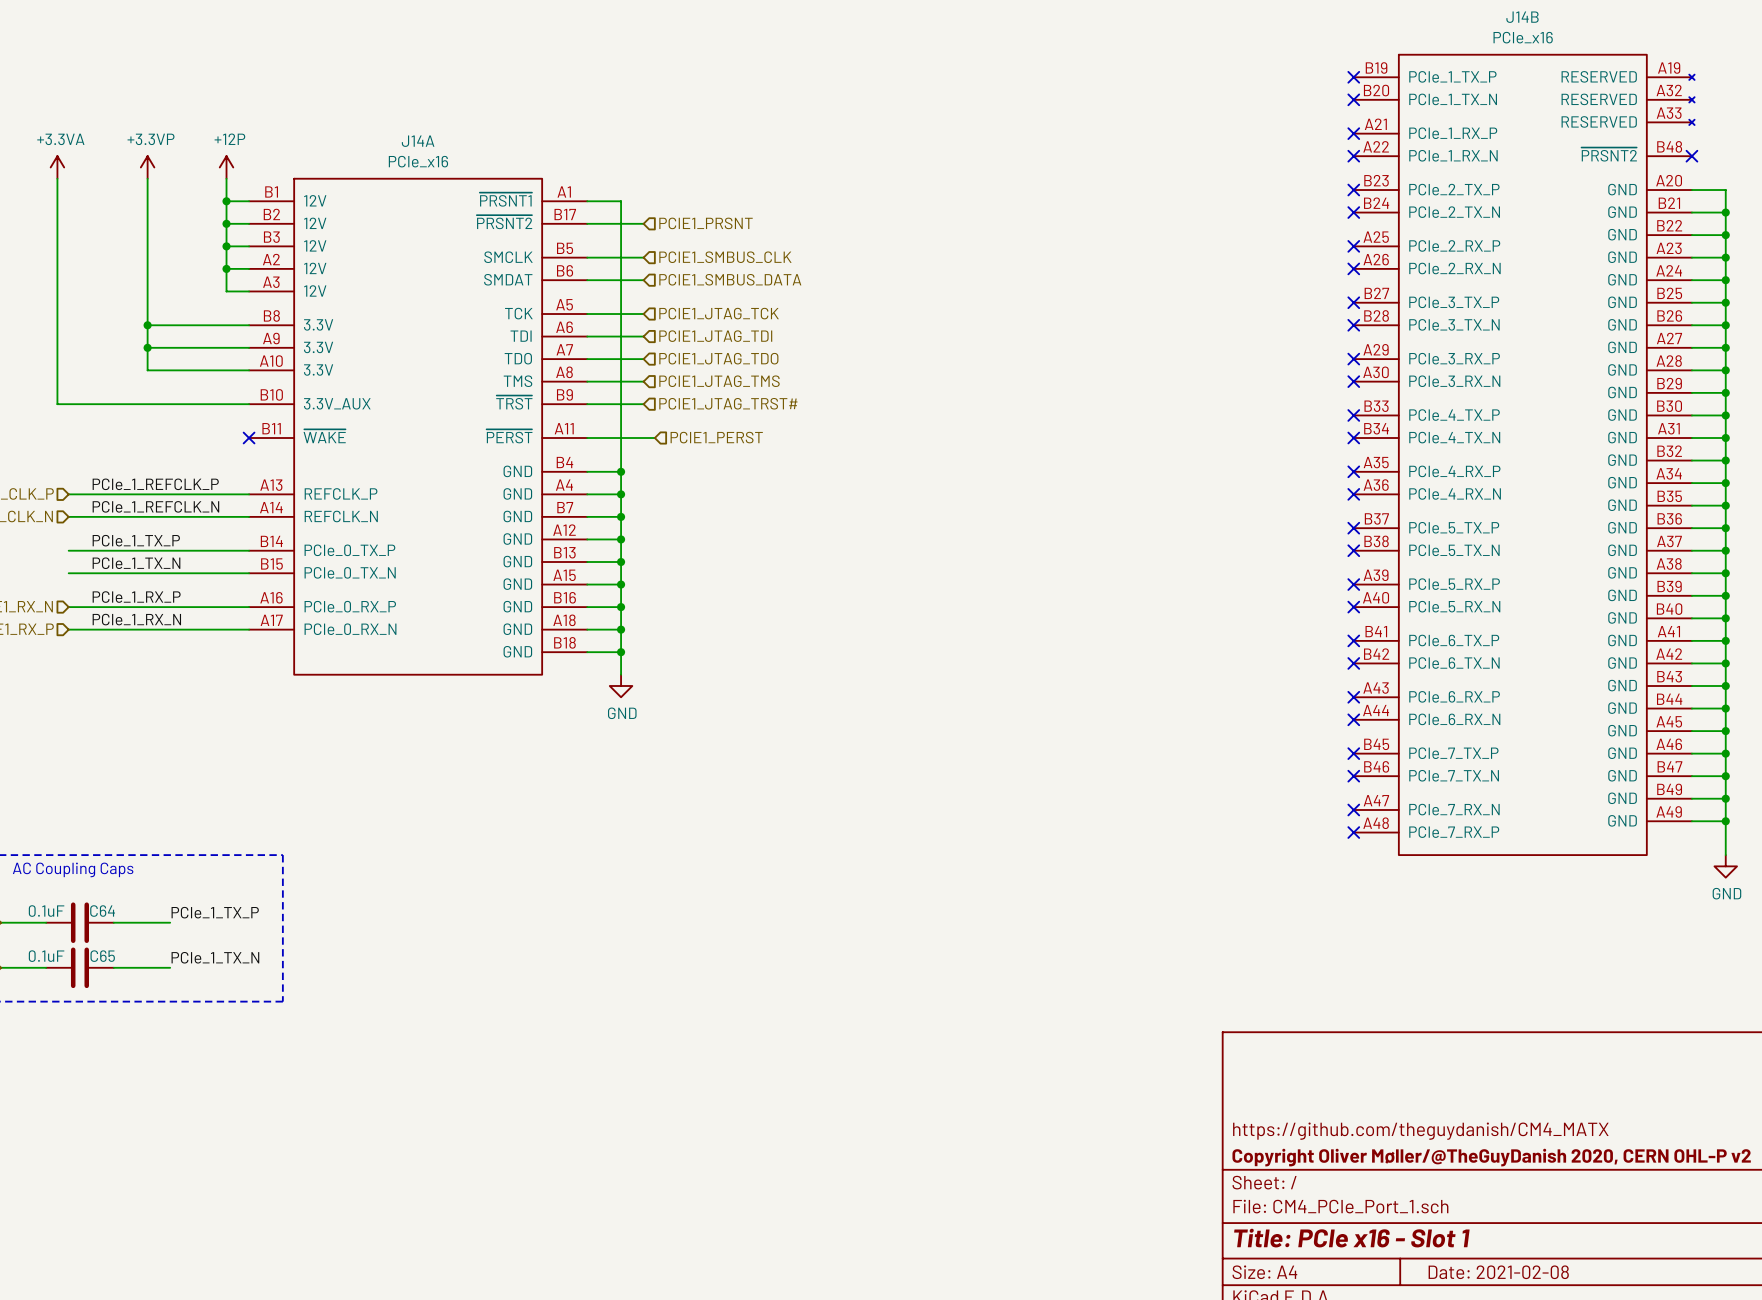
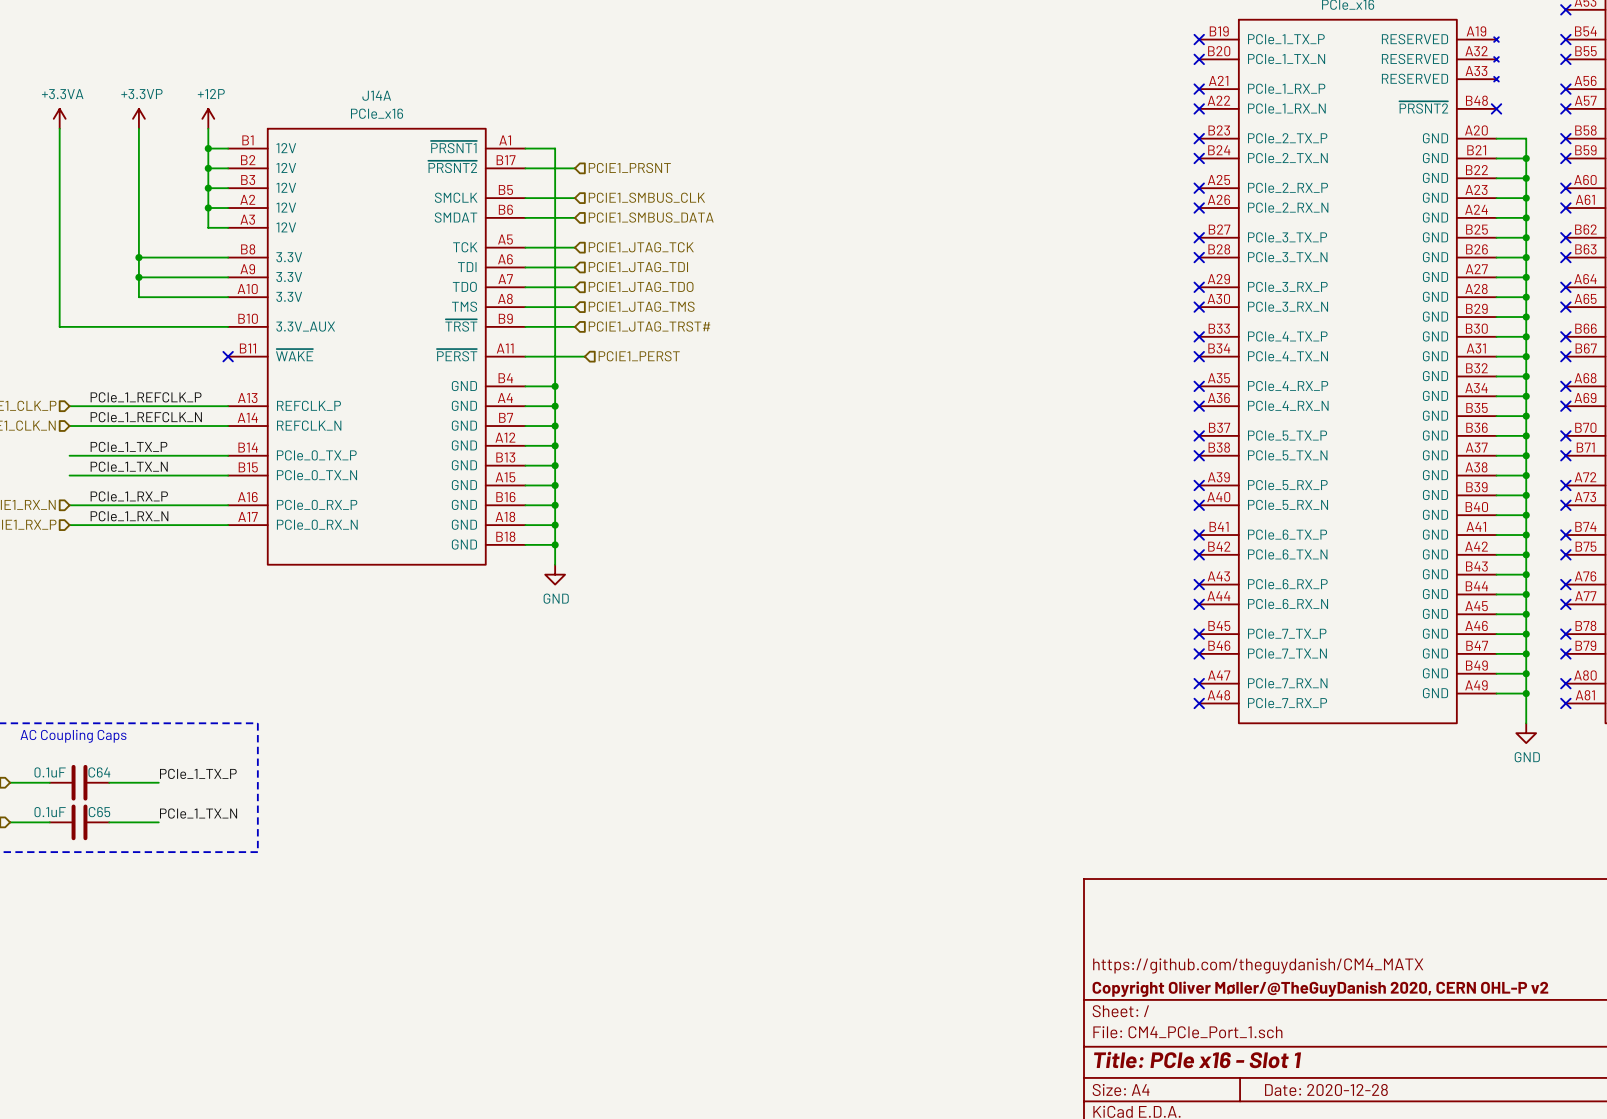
title block: Date: 2021-02-08 (1498, 1272) -> Date: 2020-12-28 (1326, 1090)

